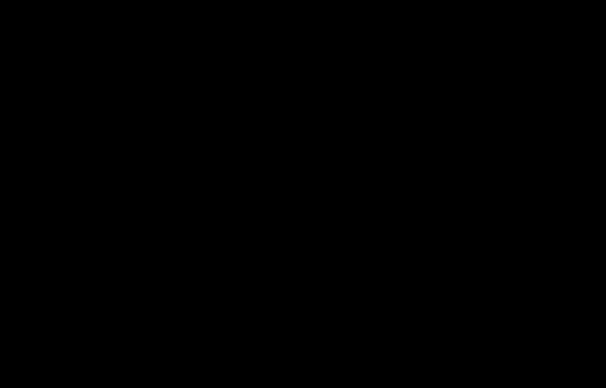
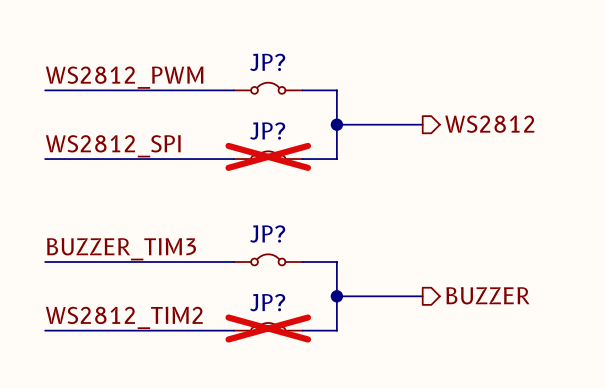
label: none -> WS2812_PWM (124, 77)
JP?: none -> (268, 88)
wire: none -> (45, 90) (233, 90)
wire: none -> (302, 90) (336, 90) (336, 159) (302, 159)
wire: none -> (336, 124) (422, 124)
junction: none -> (336, 124)
hierarchical label: none -> WS2812 (489, 124)
label: none -> WS2812_SPI (113, 146)
JP?: none -> (268, 156)
wire: none -> (45, 159) (233, 159)
label: none -> BUZZER_TIM3 (121, 249)
JP?: none -> (268, 259)
wire: none -> (45, 261) (233, 261)
wire: none -> (302, 261) (336, 261) (336, 330) (302, 330)
hierarchical label: none -> BUZZER (487, 295)
wire: none -> (336, 296) (422, 296)
junction: none -> (336, 296)
label: none -> WS2812_TIM2 (124, 317)
JP?: none -> (268, 328)
wire: none -> (45, 330) (233, 330)

